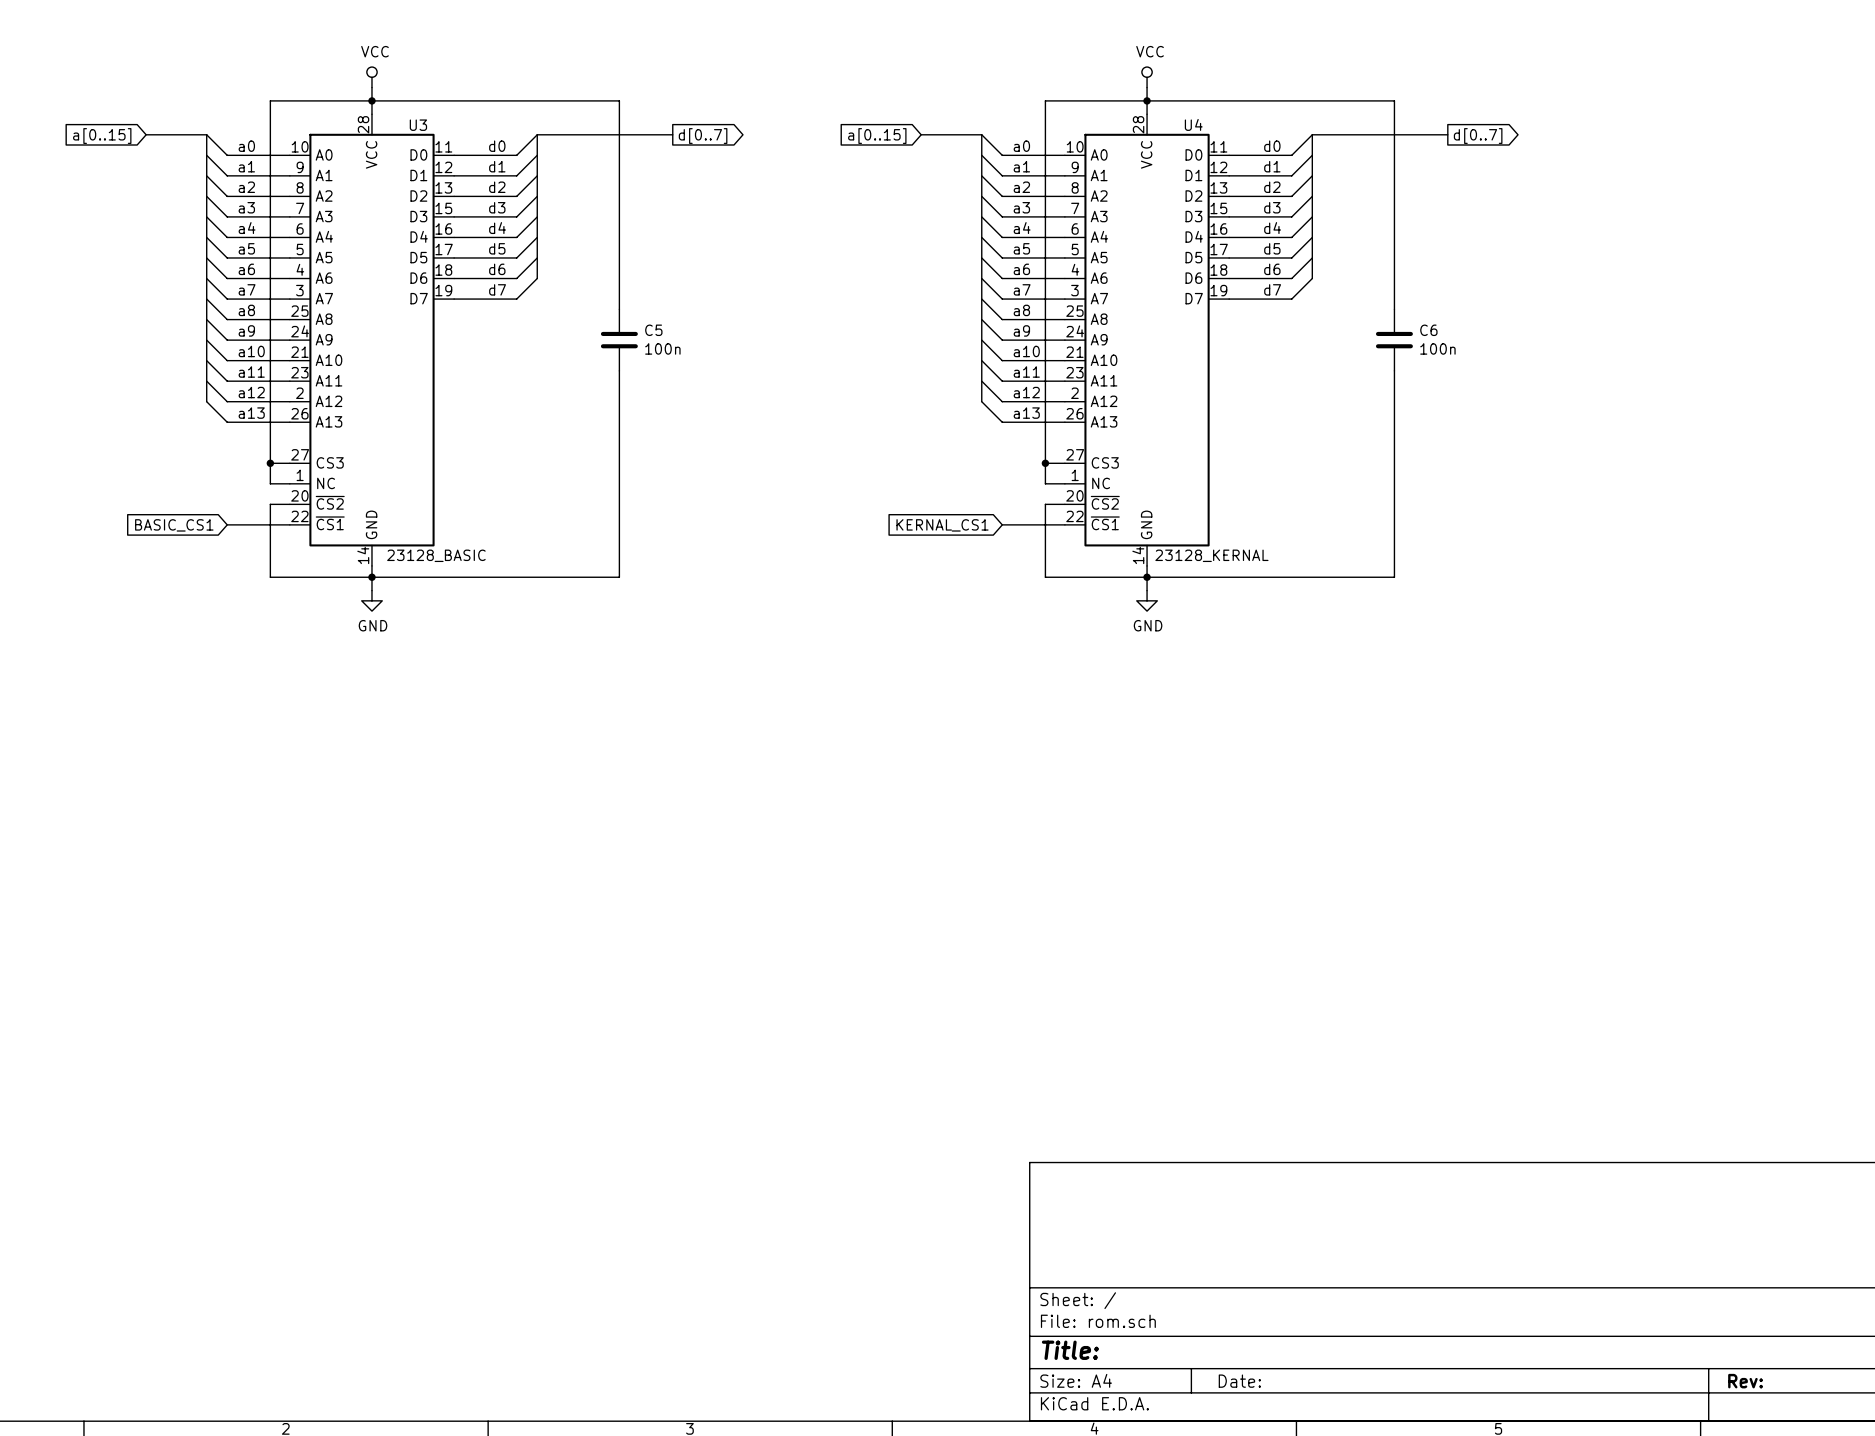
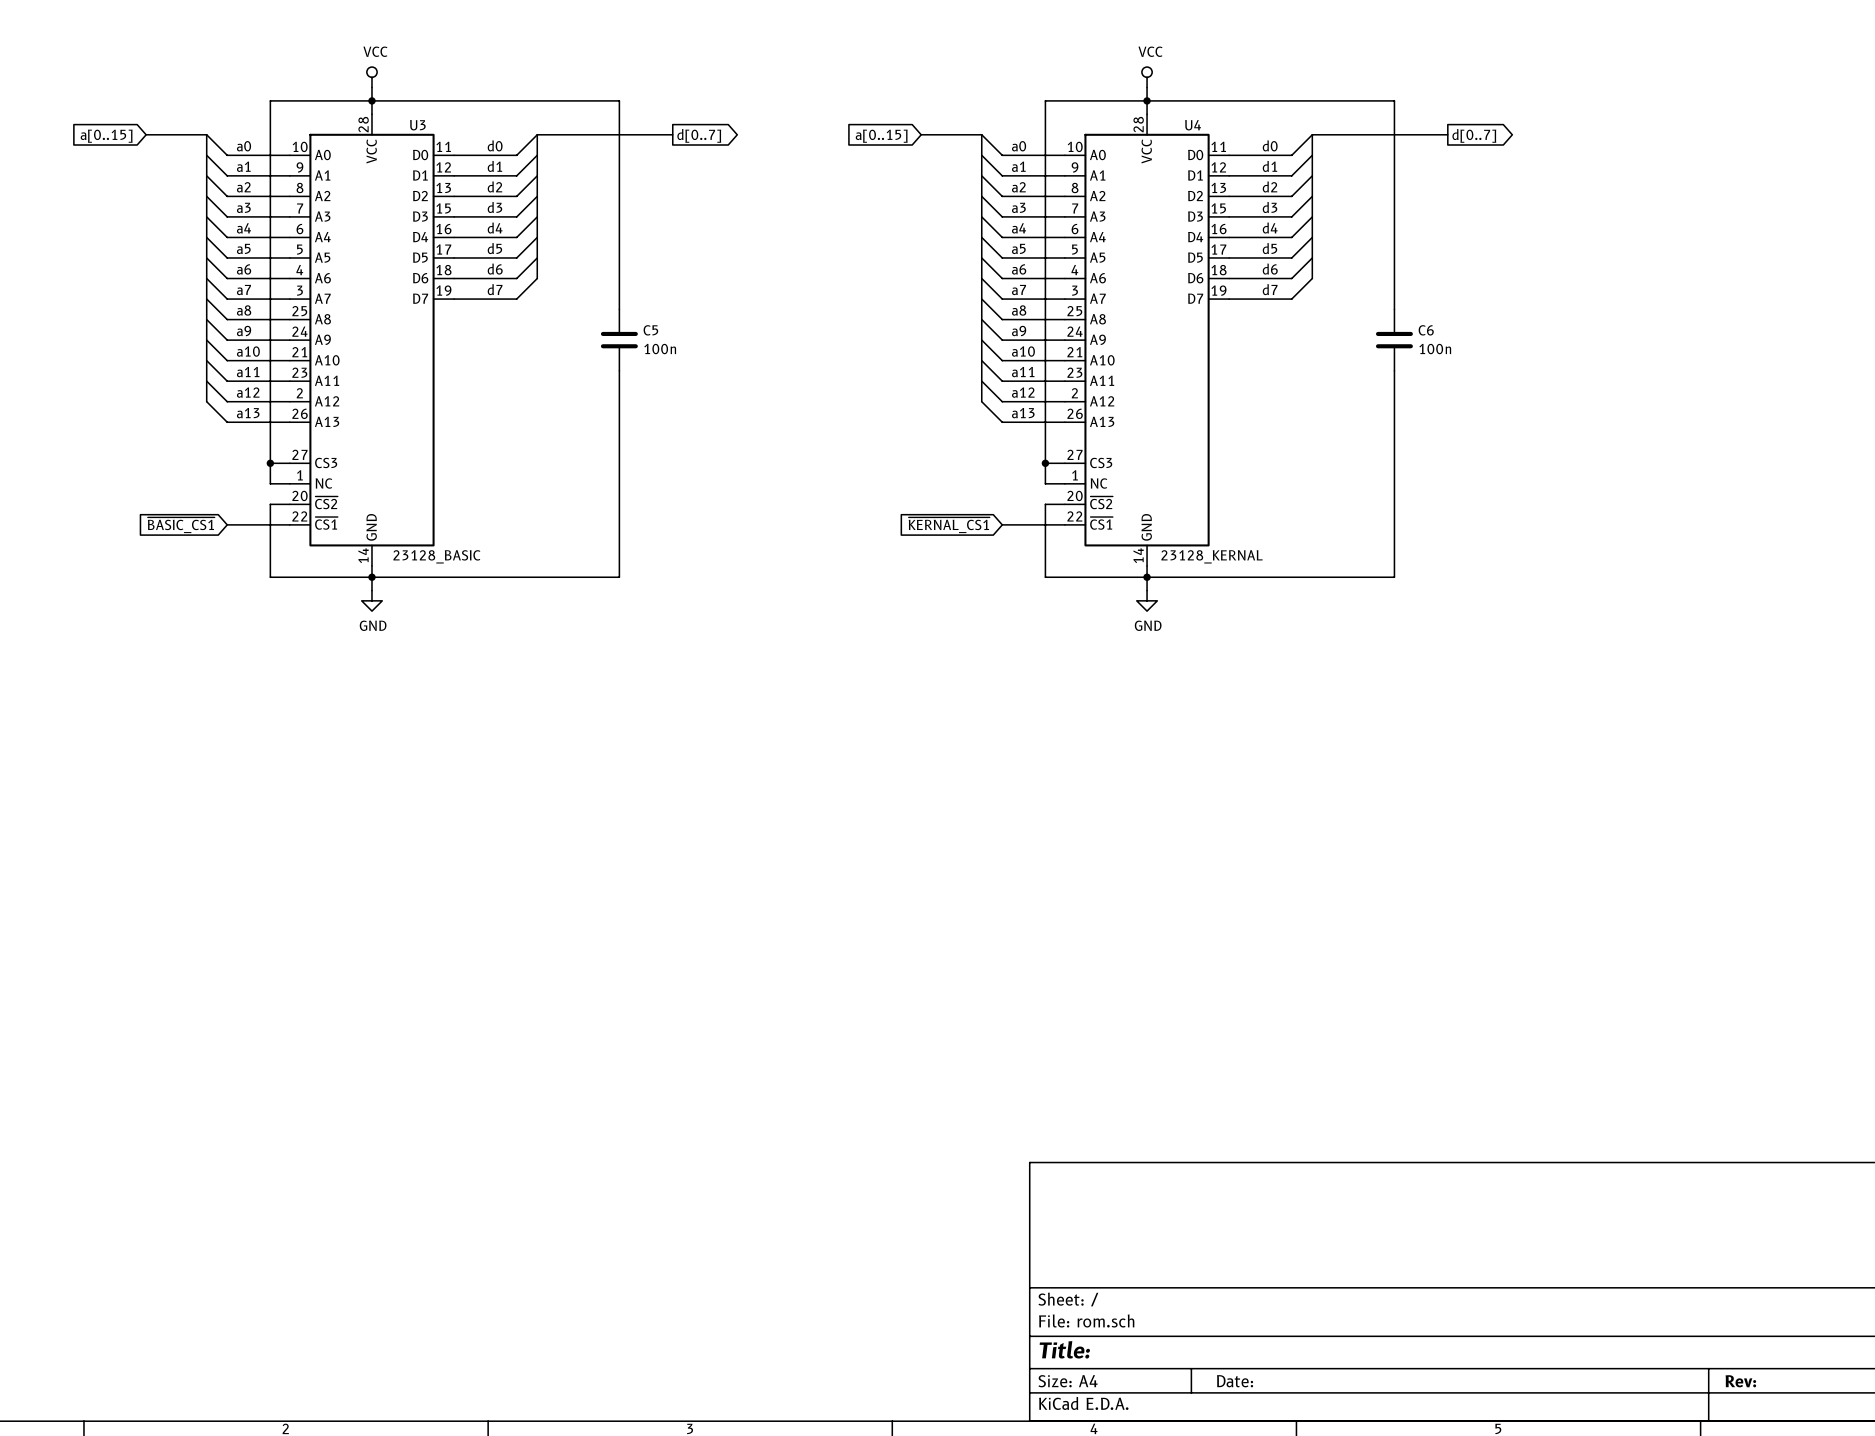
global label: BASIC_CS1 (174, 525) -> ~{BASIC_CS1} (181, 525)
global label: KERNAL_CS1 (942, 525) -> ~{KERNAL_CS1} (949, 525)

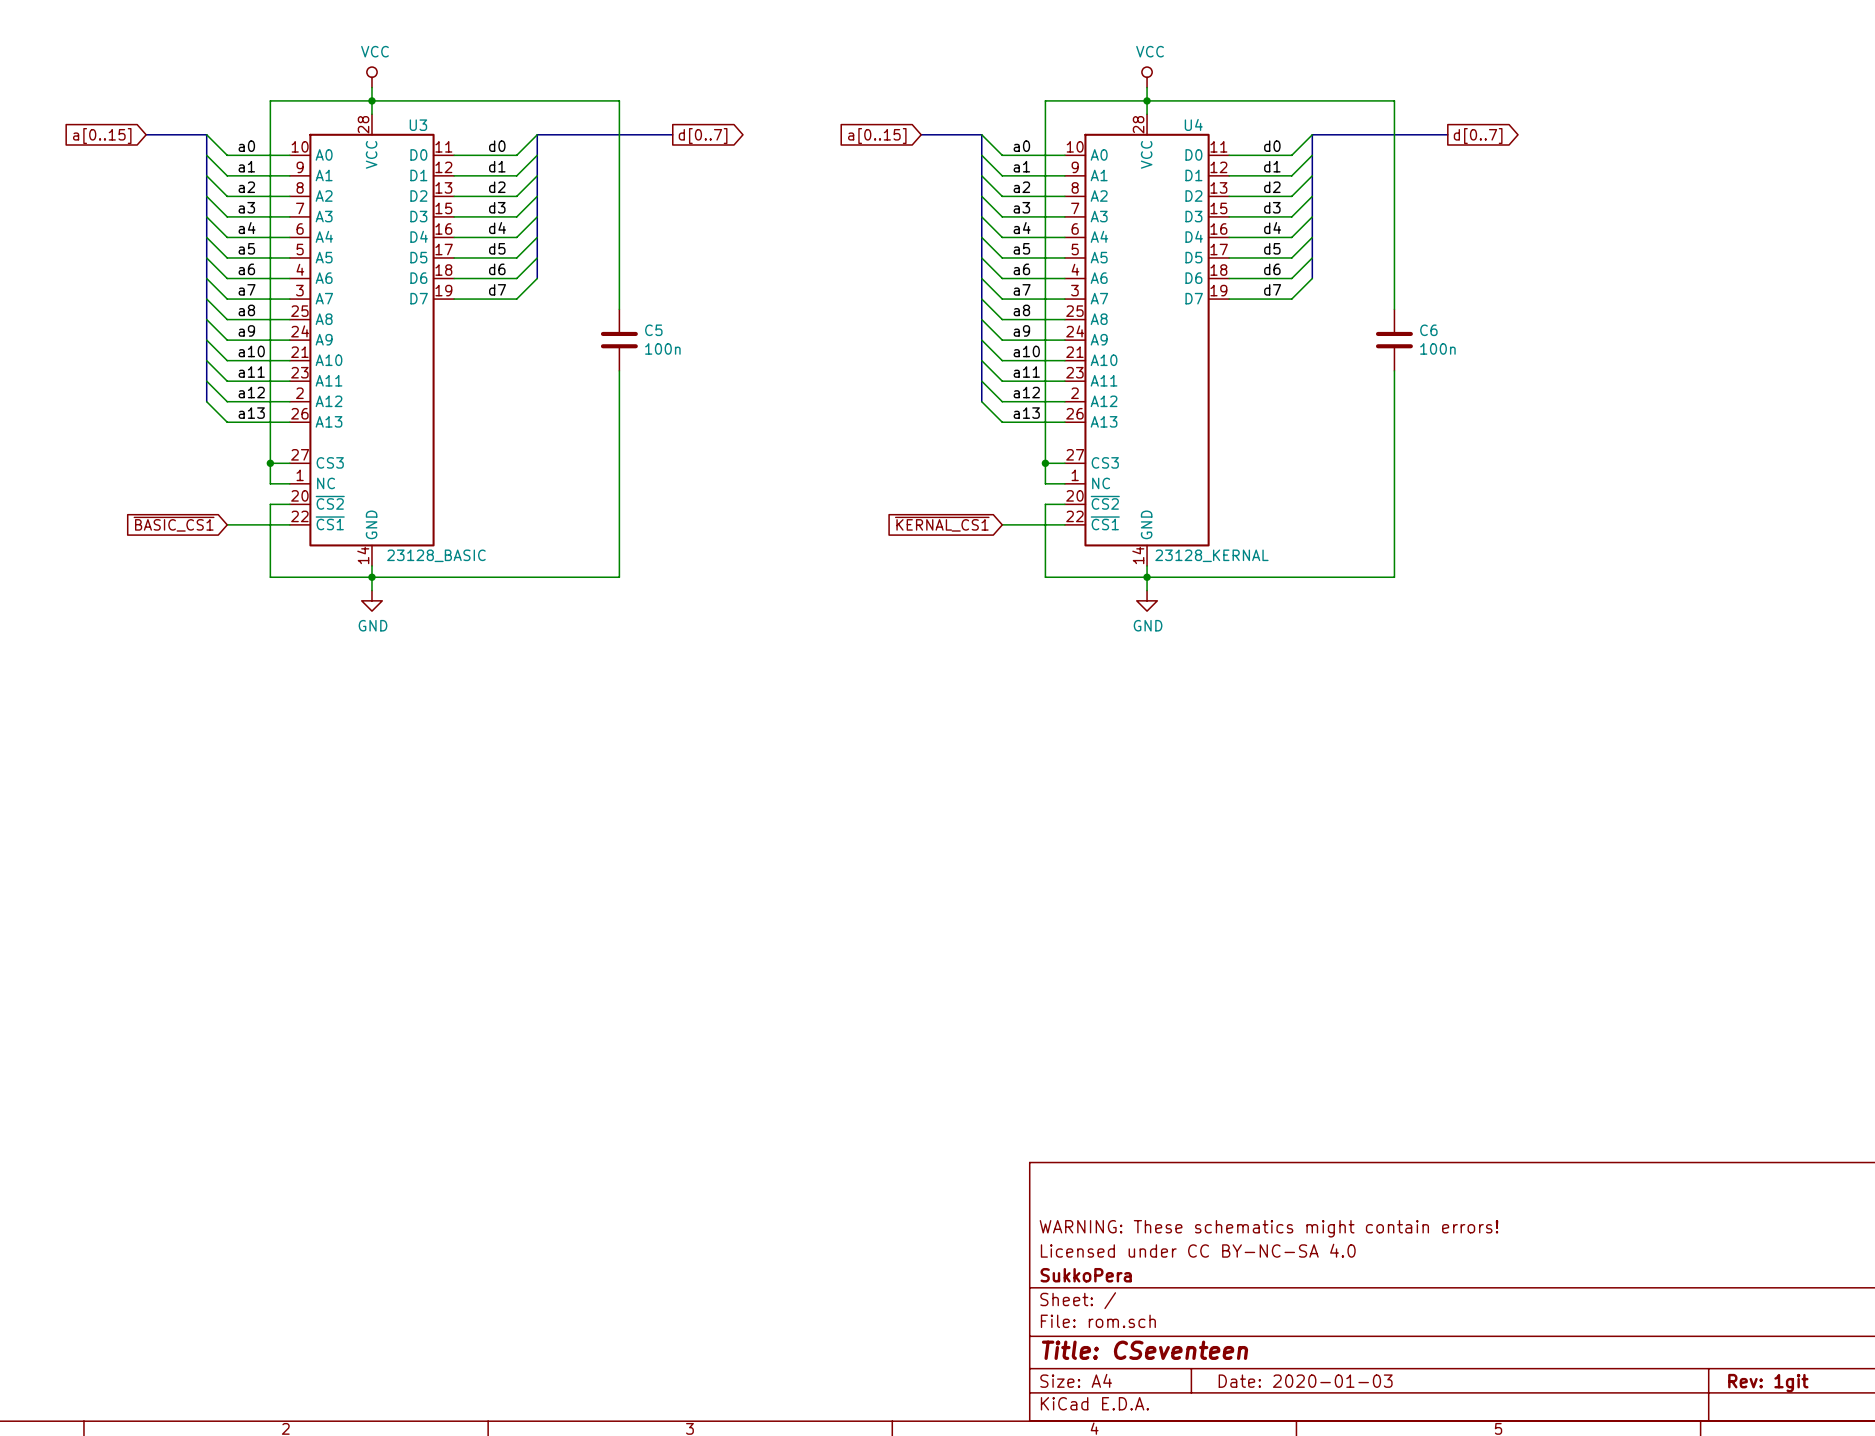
title block: none -> WARNING: These schematics might contain errors! (1268, 1228)
title block: none -> Licensed under CC BY-NC-SA 4.0 (1198, 1250)
title block: none -> SukkoPera (1086, 1275)
title block: Title: (1064, 1349) -> Title: CSeventeen (1145, 1350)
title block: Date: (1235, 1381) -> Date: 2020-01-03 (1305, 1381)
title block: Rev: (1740, 1381) -> Rev: 1git (1768, 1383)

